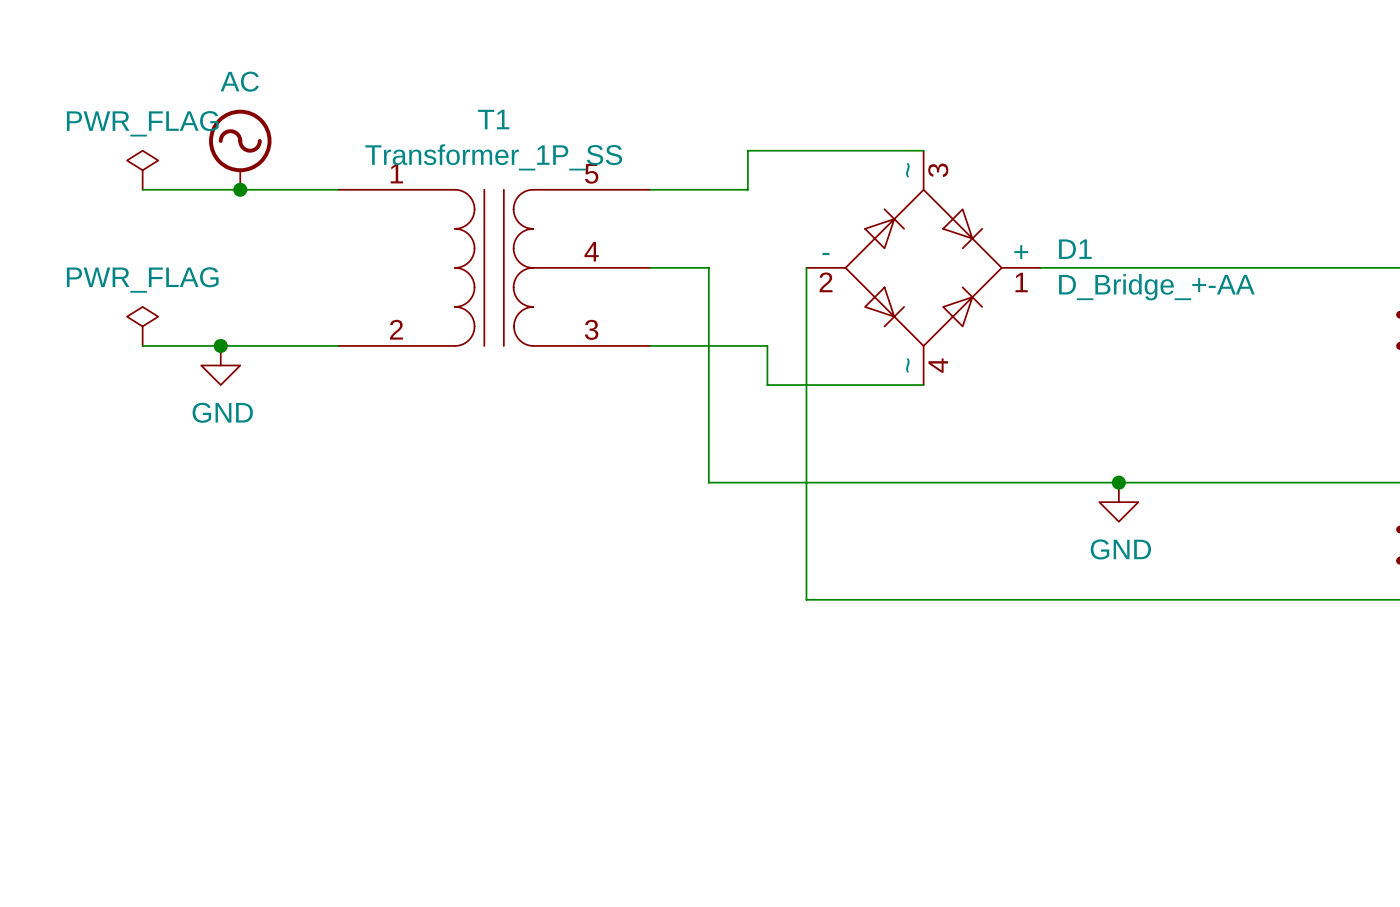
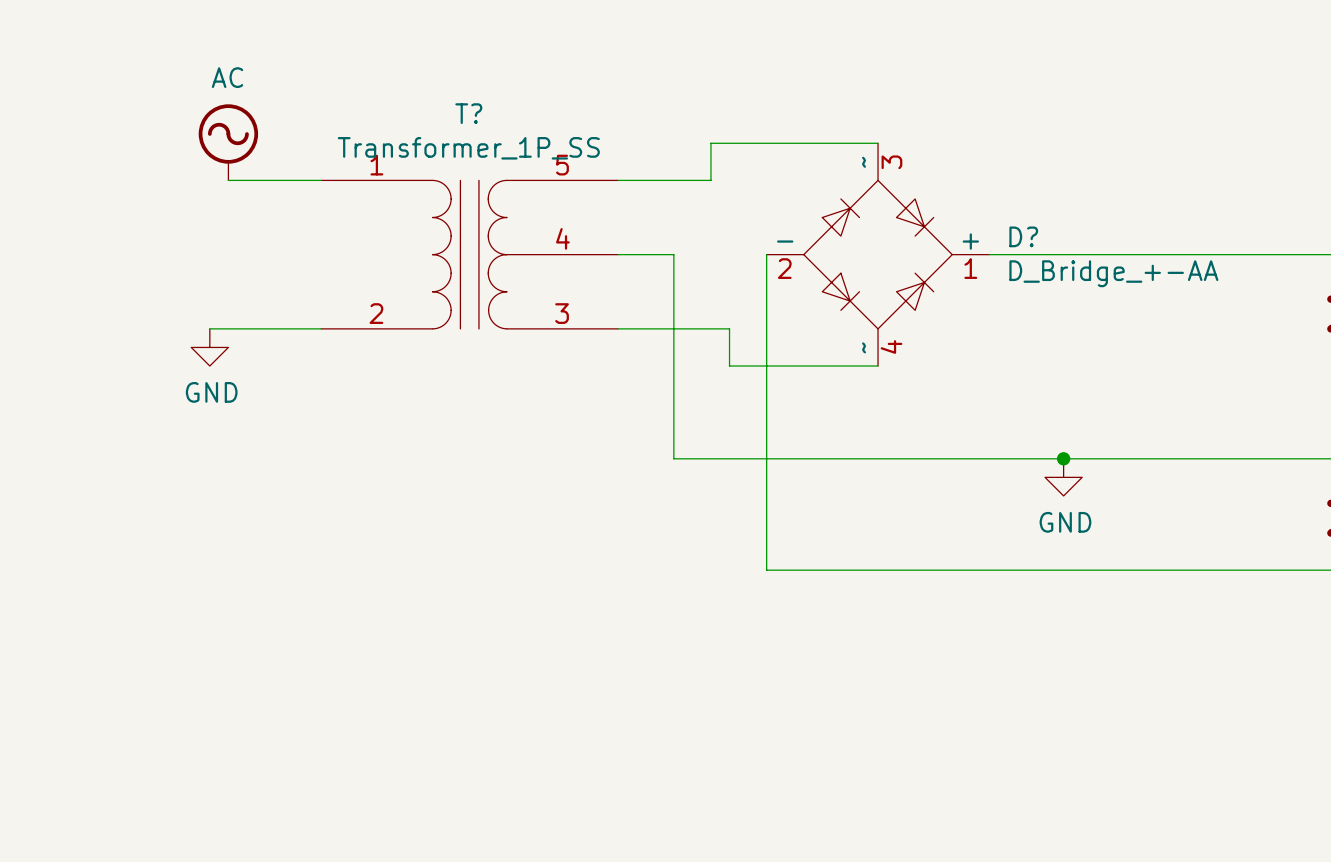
T1 name: T1 (493, 119) -> T? (468, 113)
power symbol: PWR_FLAG (142, 170) -> none
wire: (142, 189) (240, 189) -> none
junction: (240, 189) -> none
D1 name: D1 (1075, 249) -> D? (1023, 236)
power symbol: PWR_FLAG (142, 326) -> none
wire: (142, 345) (220, 345) -> none
junction: (220, 345) -> none

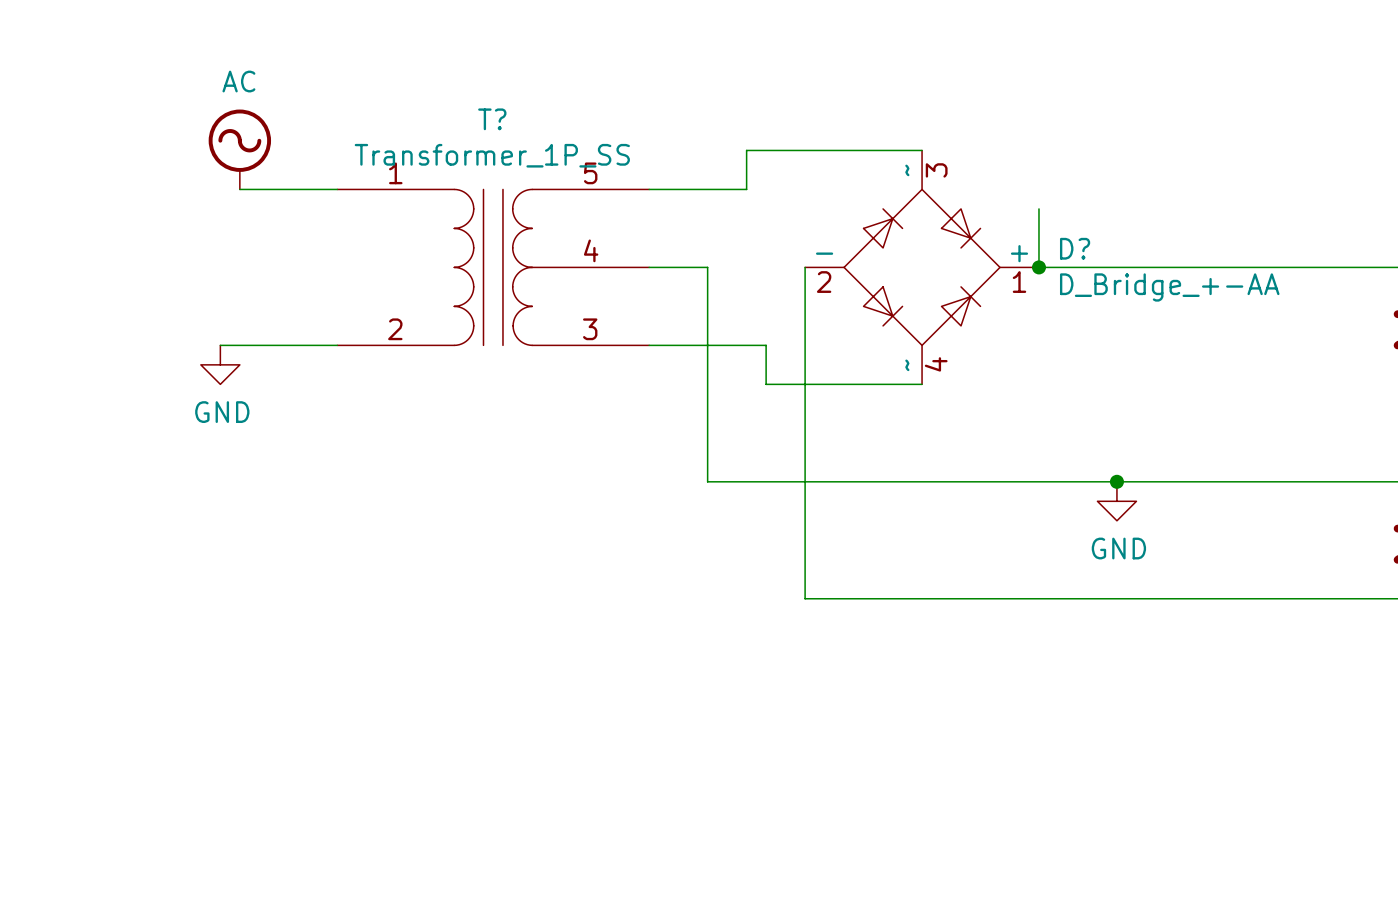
wire: none -> (1038, 208) (1038, 267)
junction: none -> (1038, 267)

